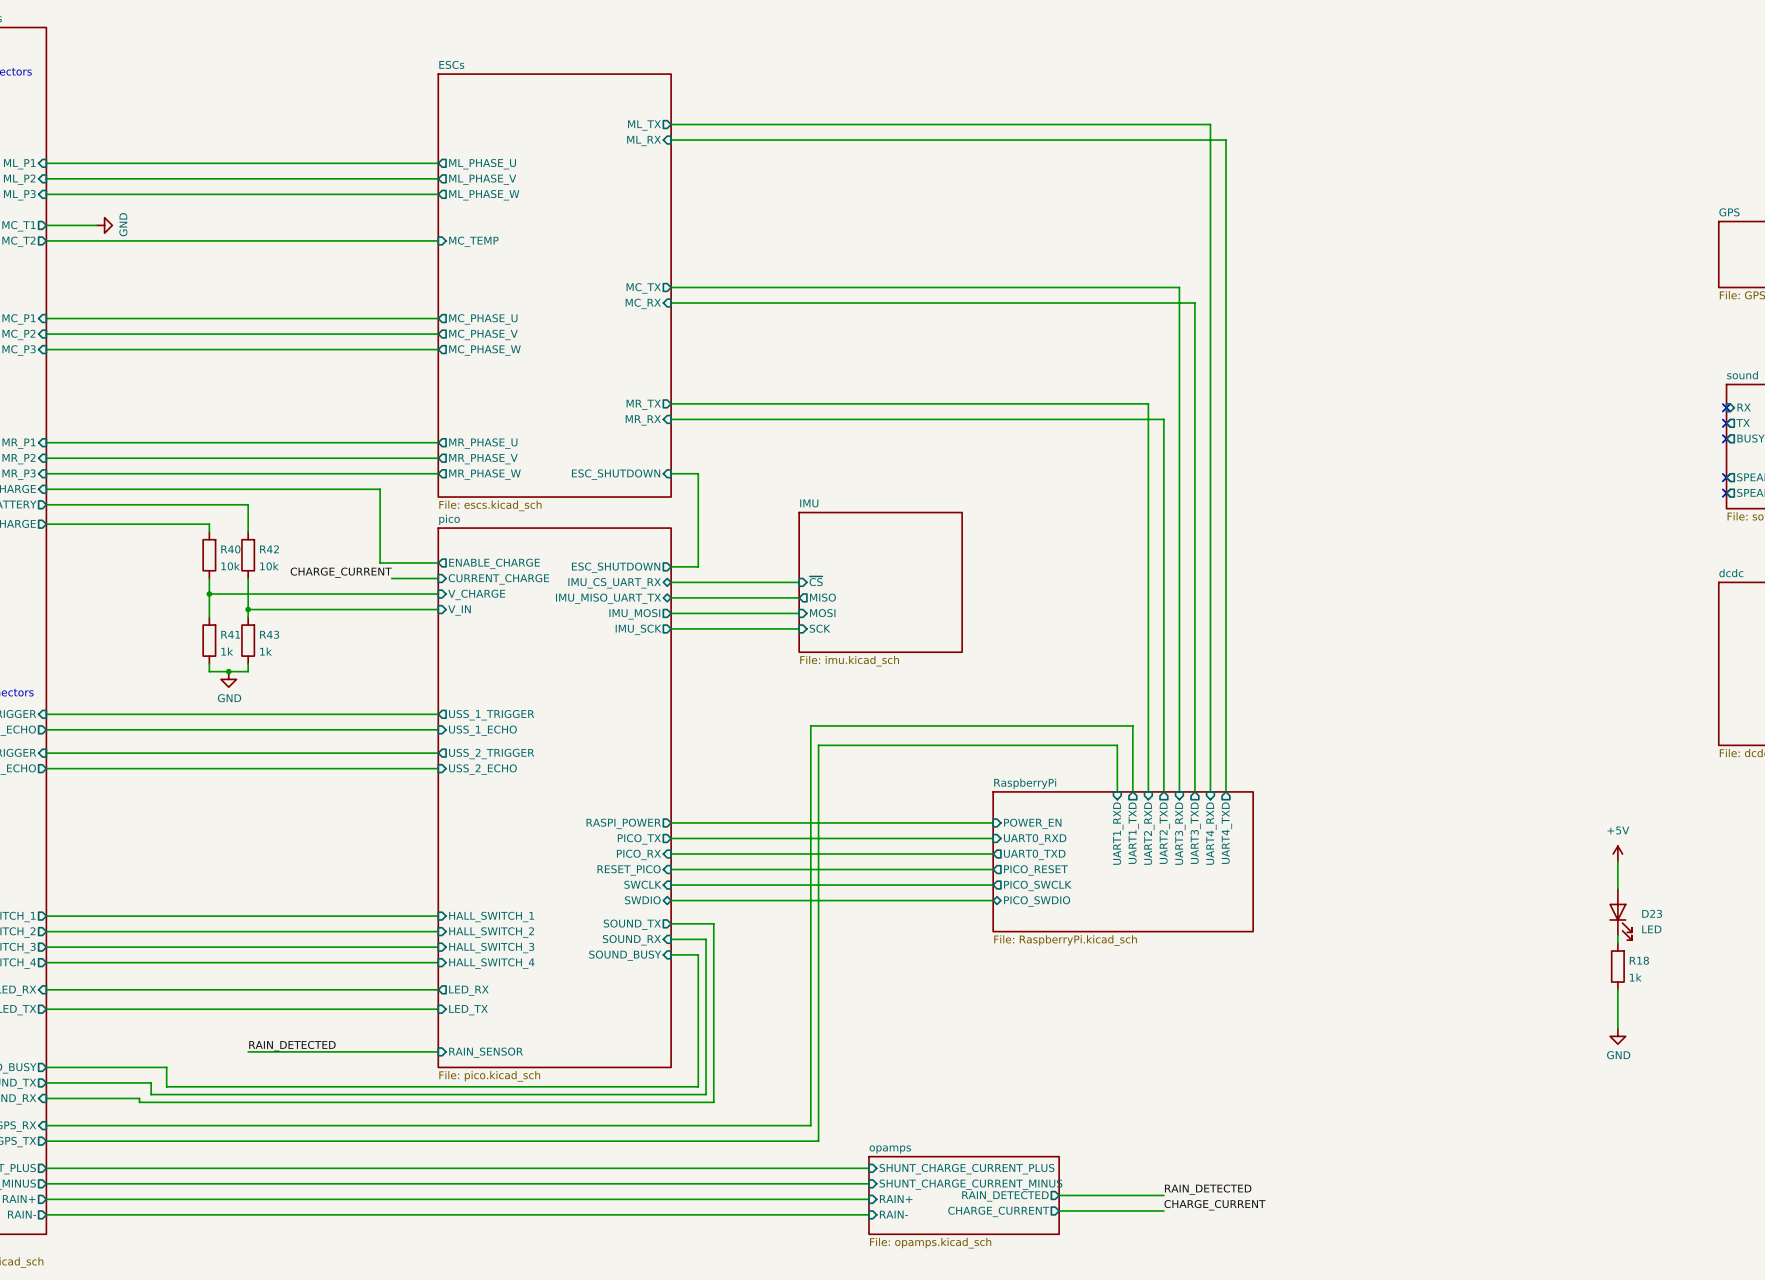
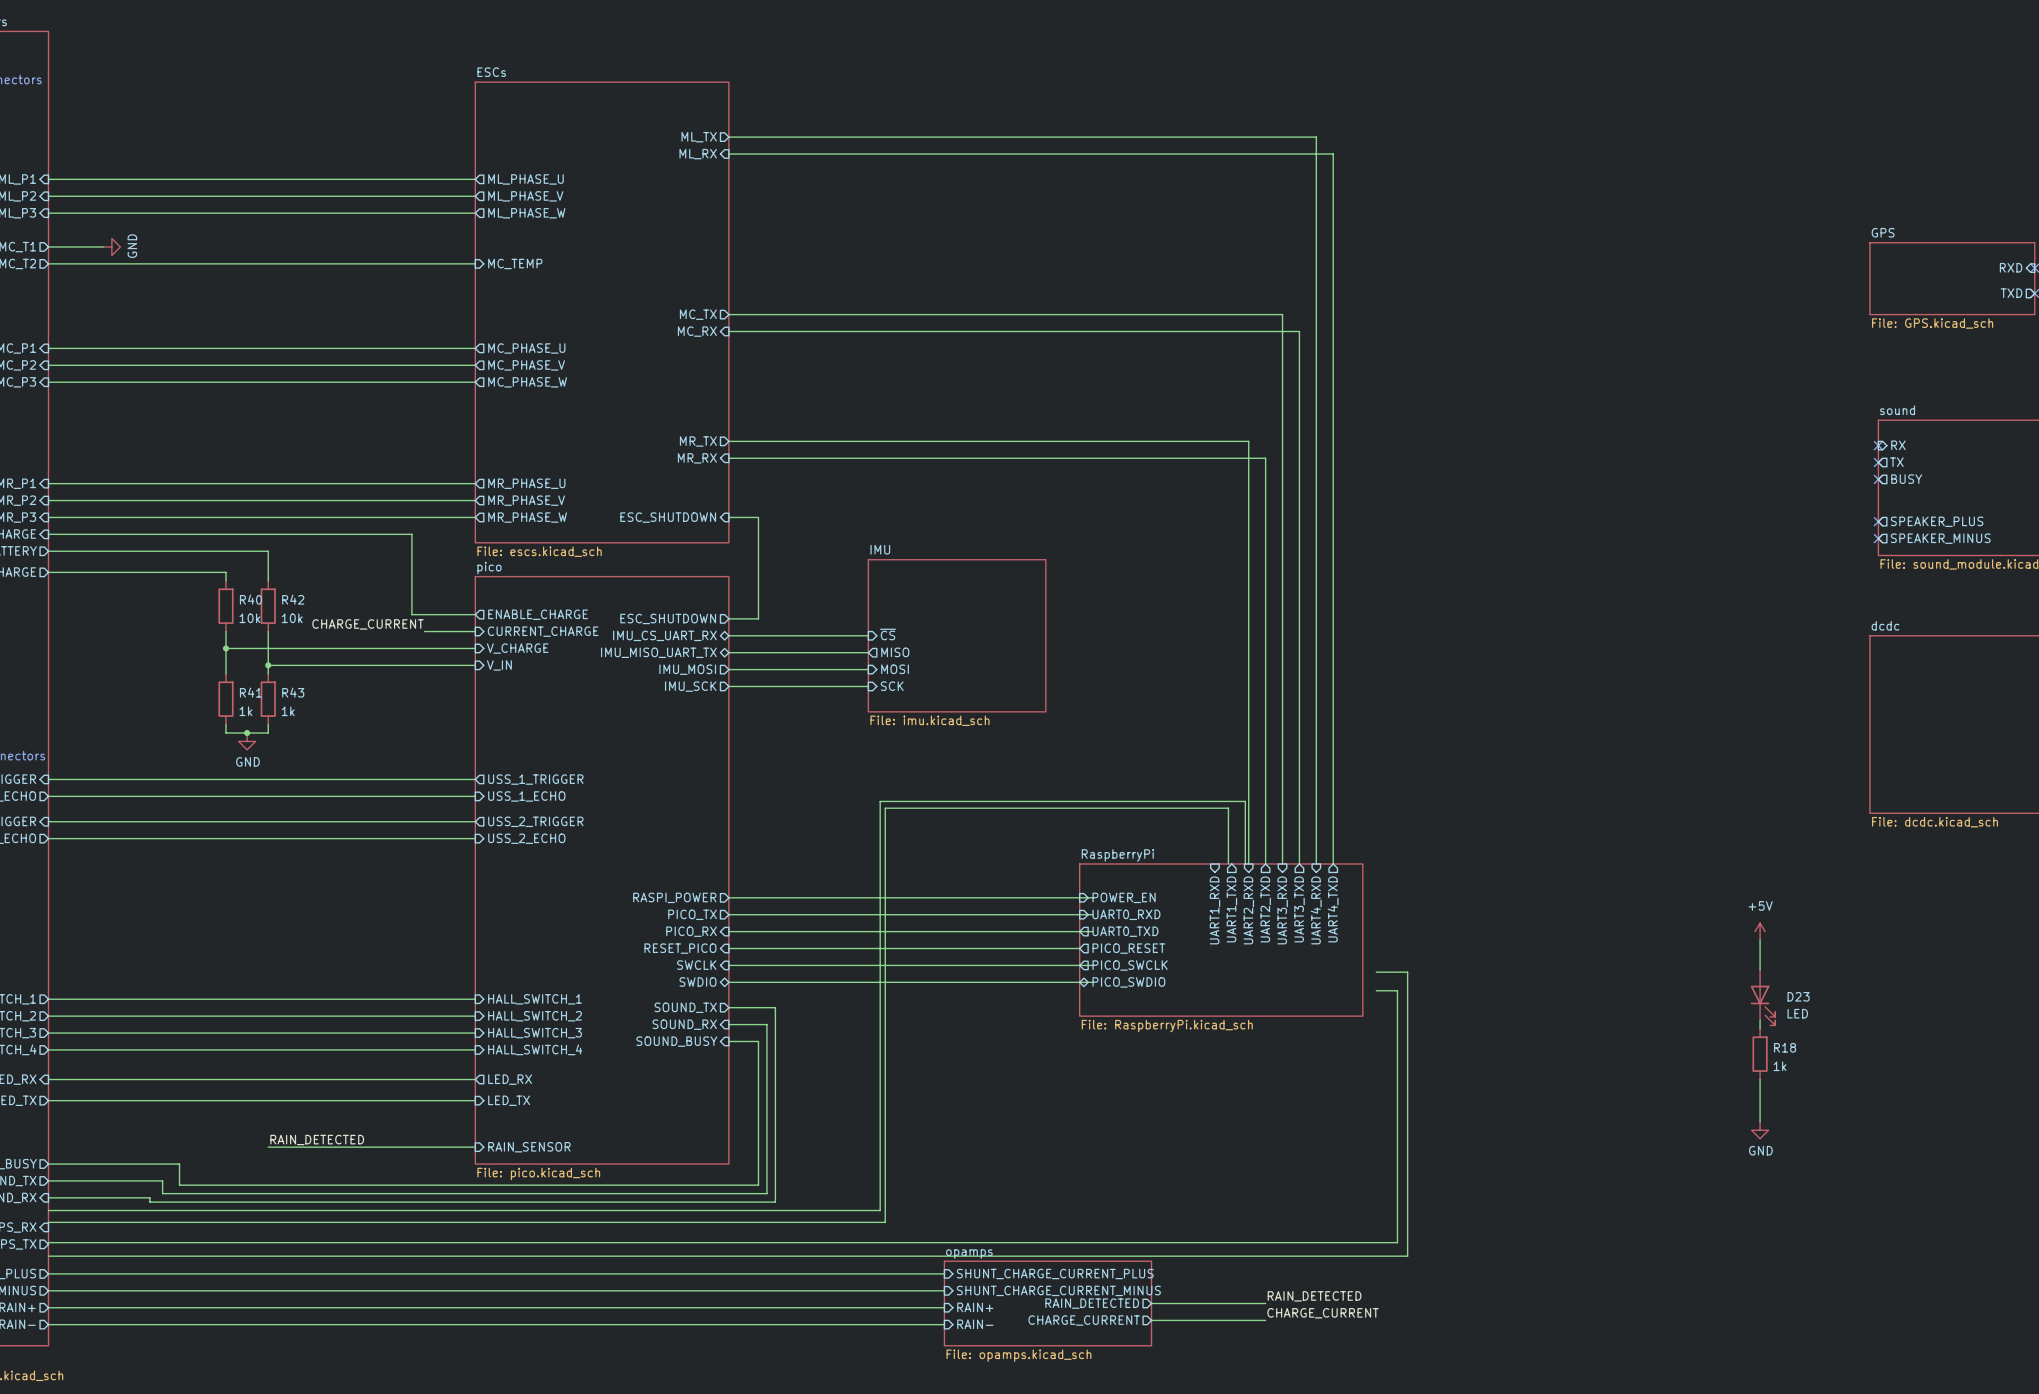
wire: (1117, 791) (1117, 745) (818, 745) (818, 1141) (46, 1141) -> none
wire: none -> (1228, 863) (1228, 808) (885, 808) (885, 1222) (48, 1222)
wire: (1132, 791) (1132, 725) (810, 725) (810, 1125) (46, 1125) -> none
wire: none -> (1245, 863) (1245, 801) (880, 801) (880, 1210) (48, 1210)
wire: none -> (1079, 897) (1093, 897)
wire: none -> (1079, 914) (1093, 914)
wire: none -> (1079, 931) (1093, 931)
wire: none -> (1079, 965) (1093, 965)
wire: none -> (1376, 972) (1407, 972) (1407, 1256) (48, 1256)
wire: none -> (1079, 982) (1093, 982)
wire: none -> (1376, 990) (1397, 990) (1397, 1242) (48, 1242)

